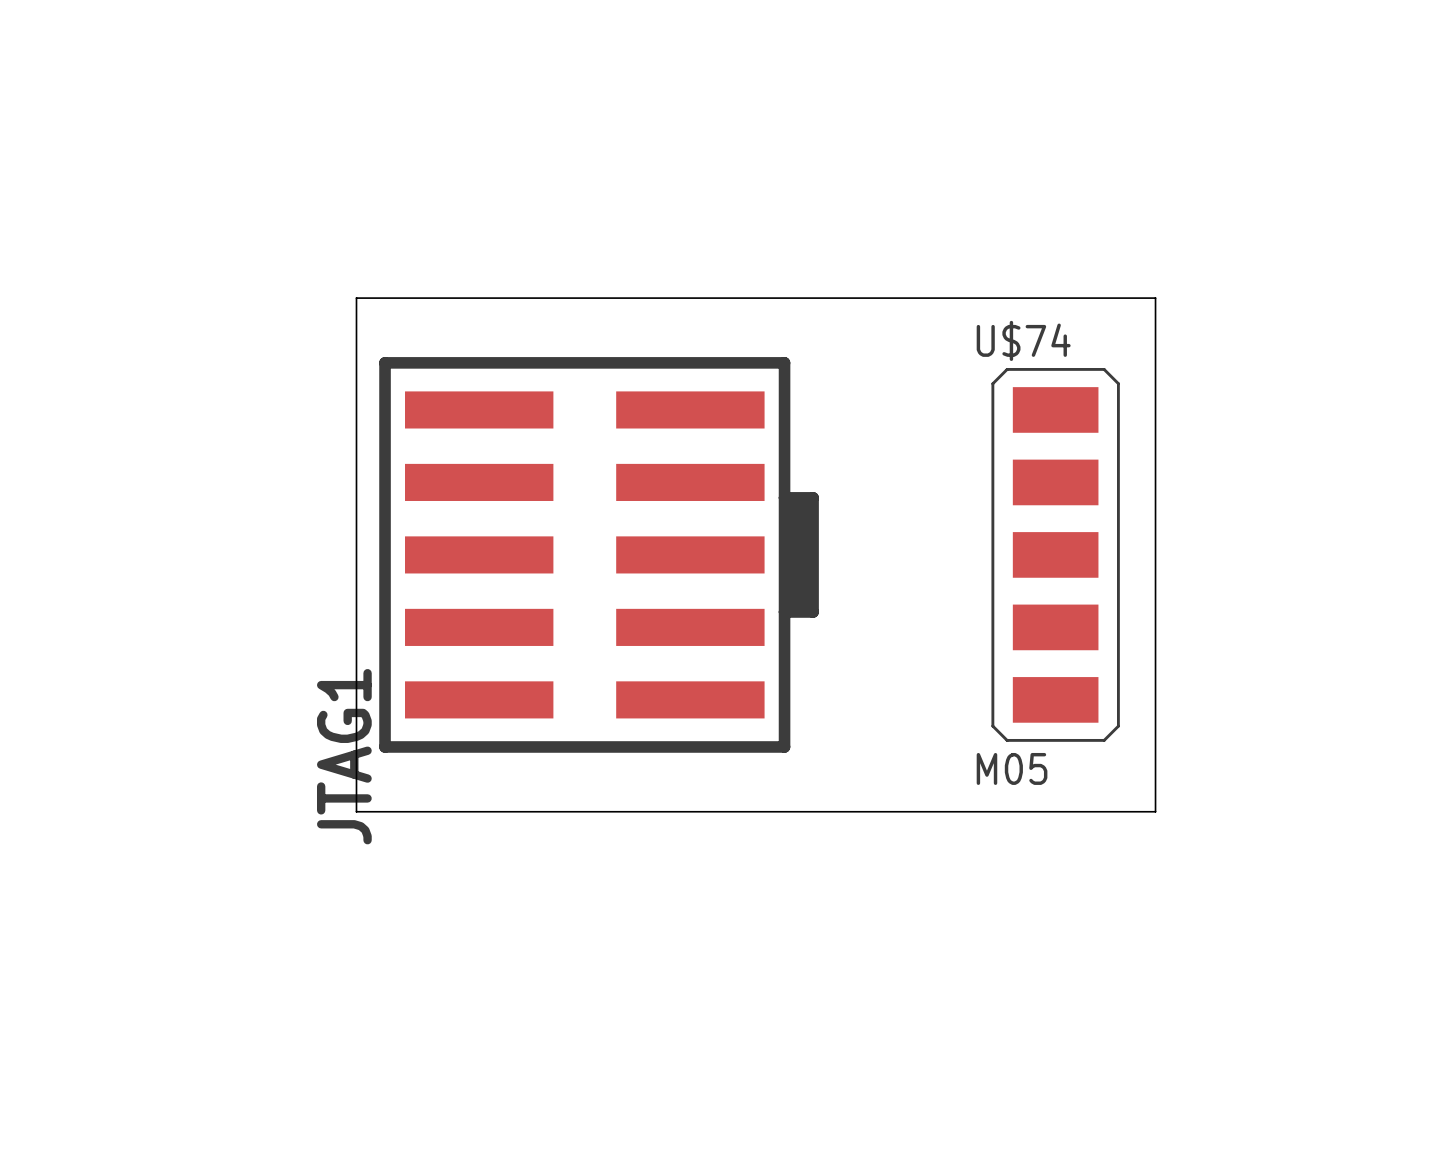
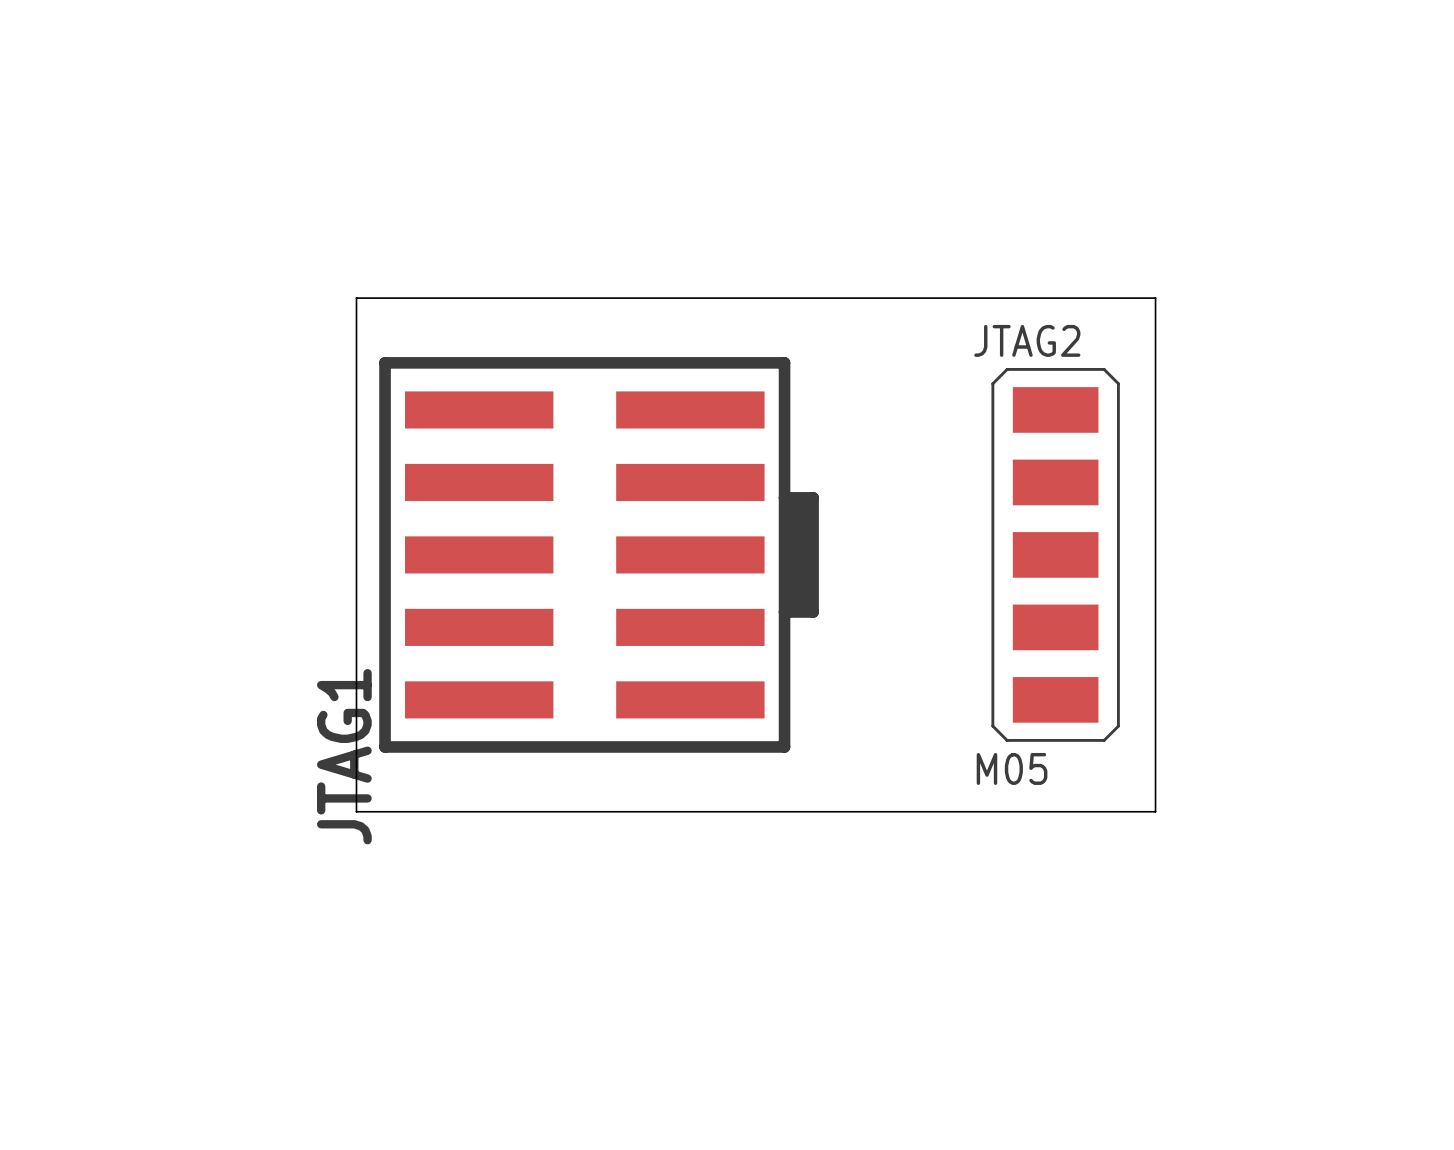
U$74 name: U$74 (1023, 340) -> JTAG2 (1027, 340)

